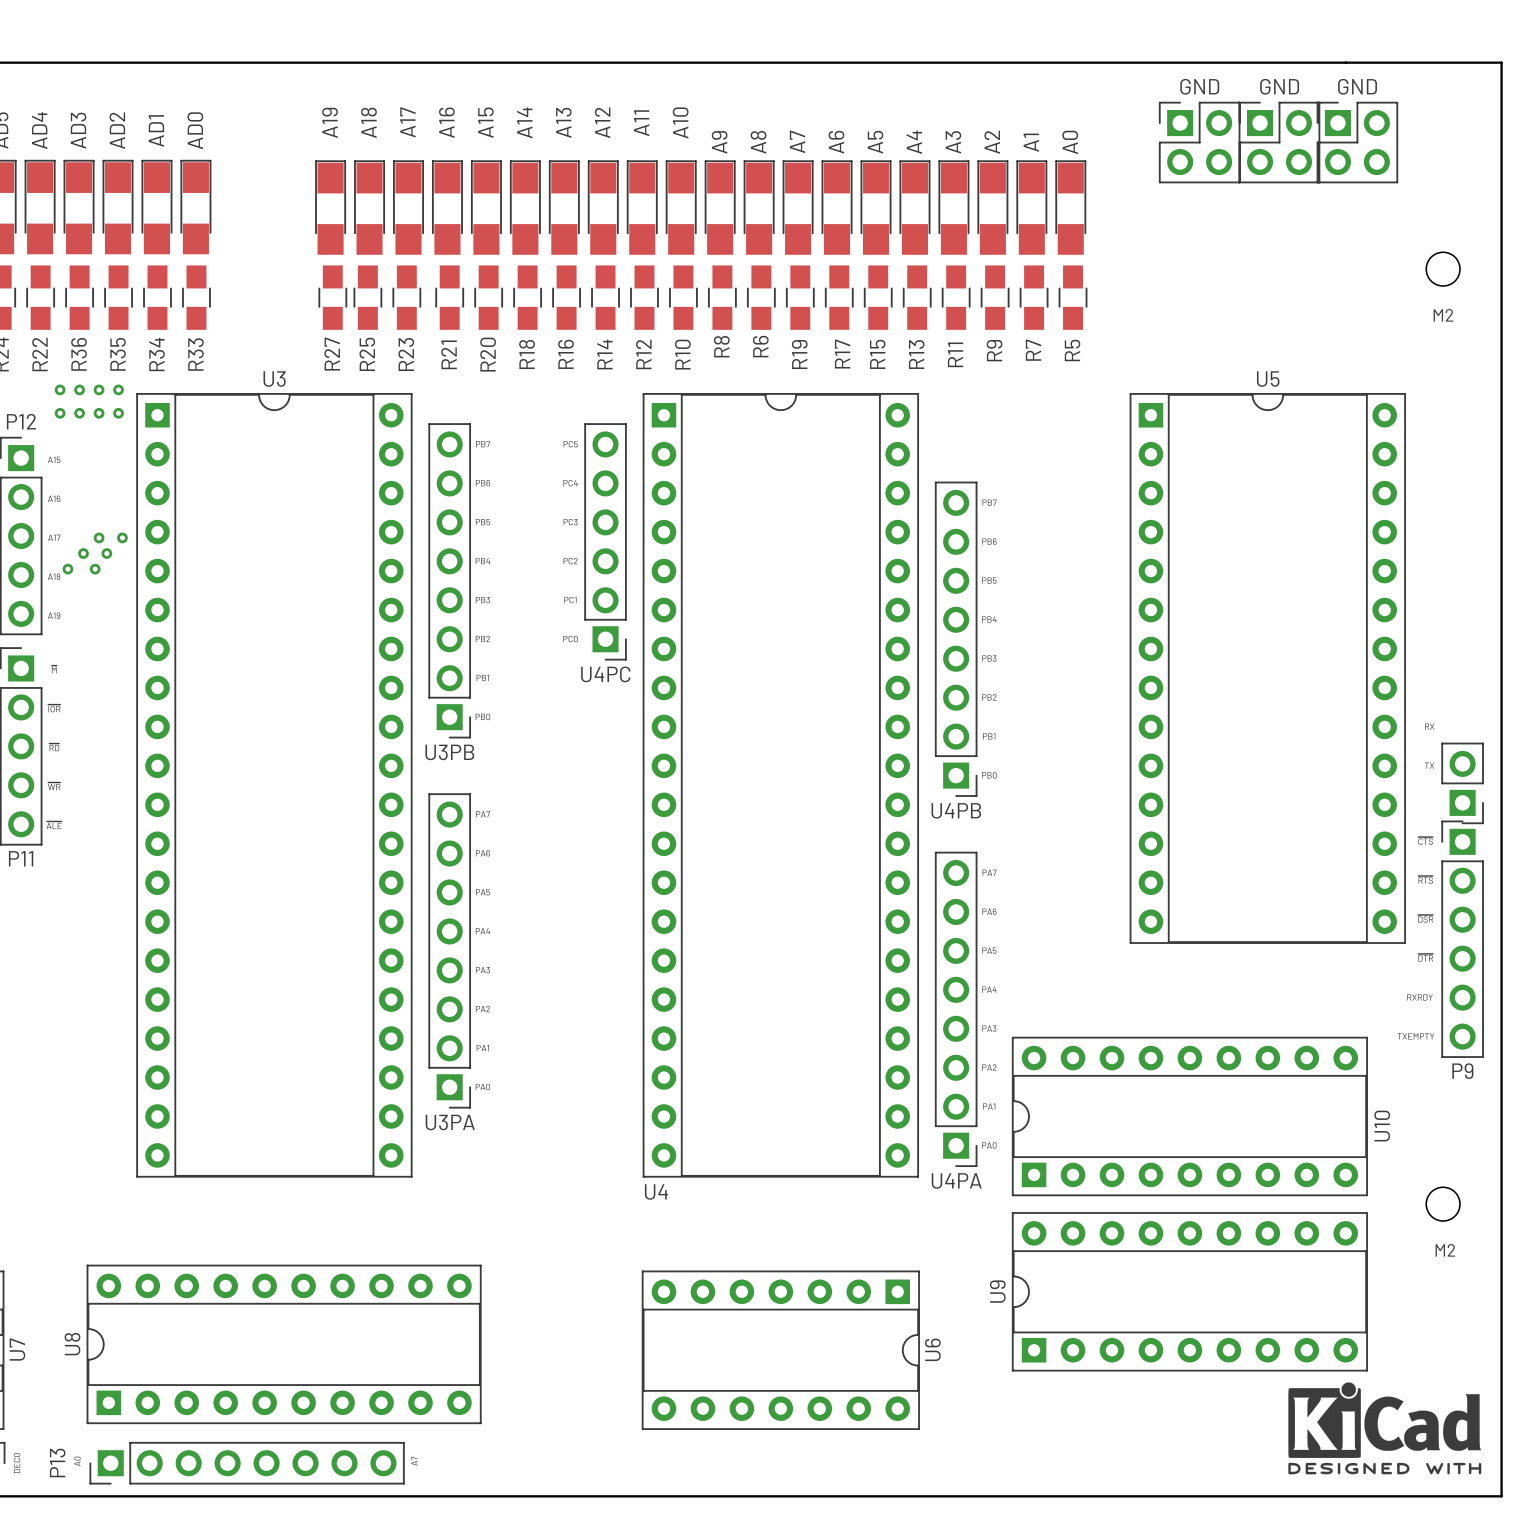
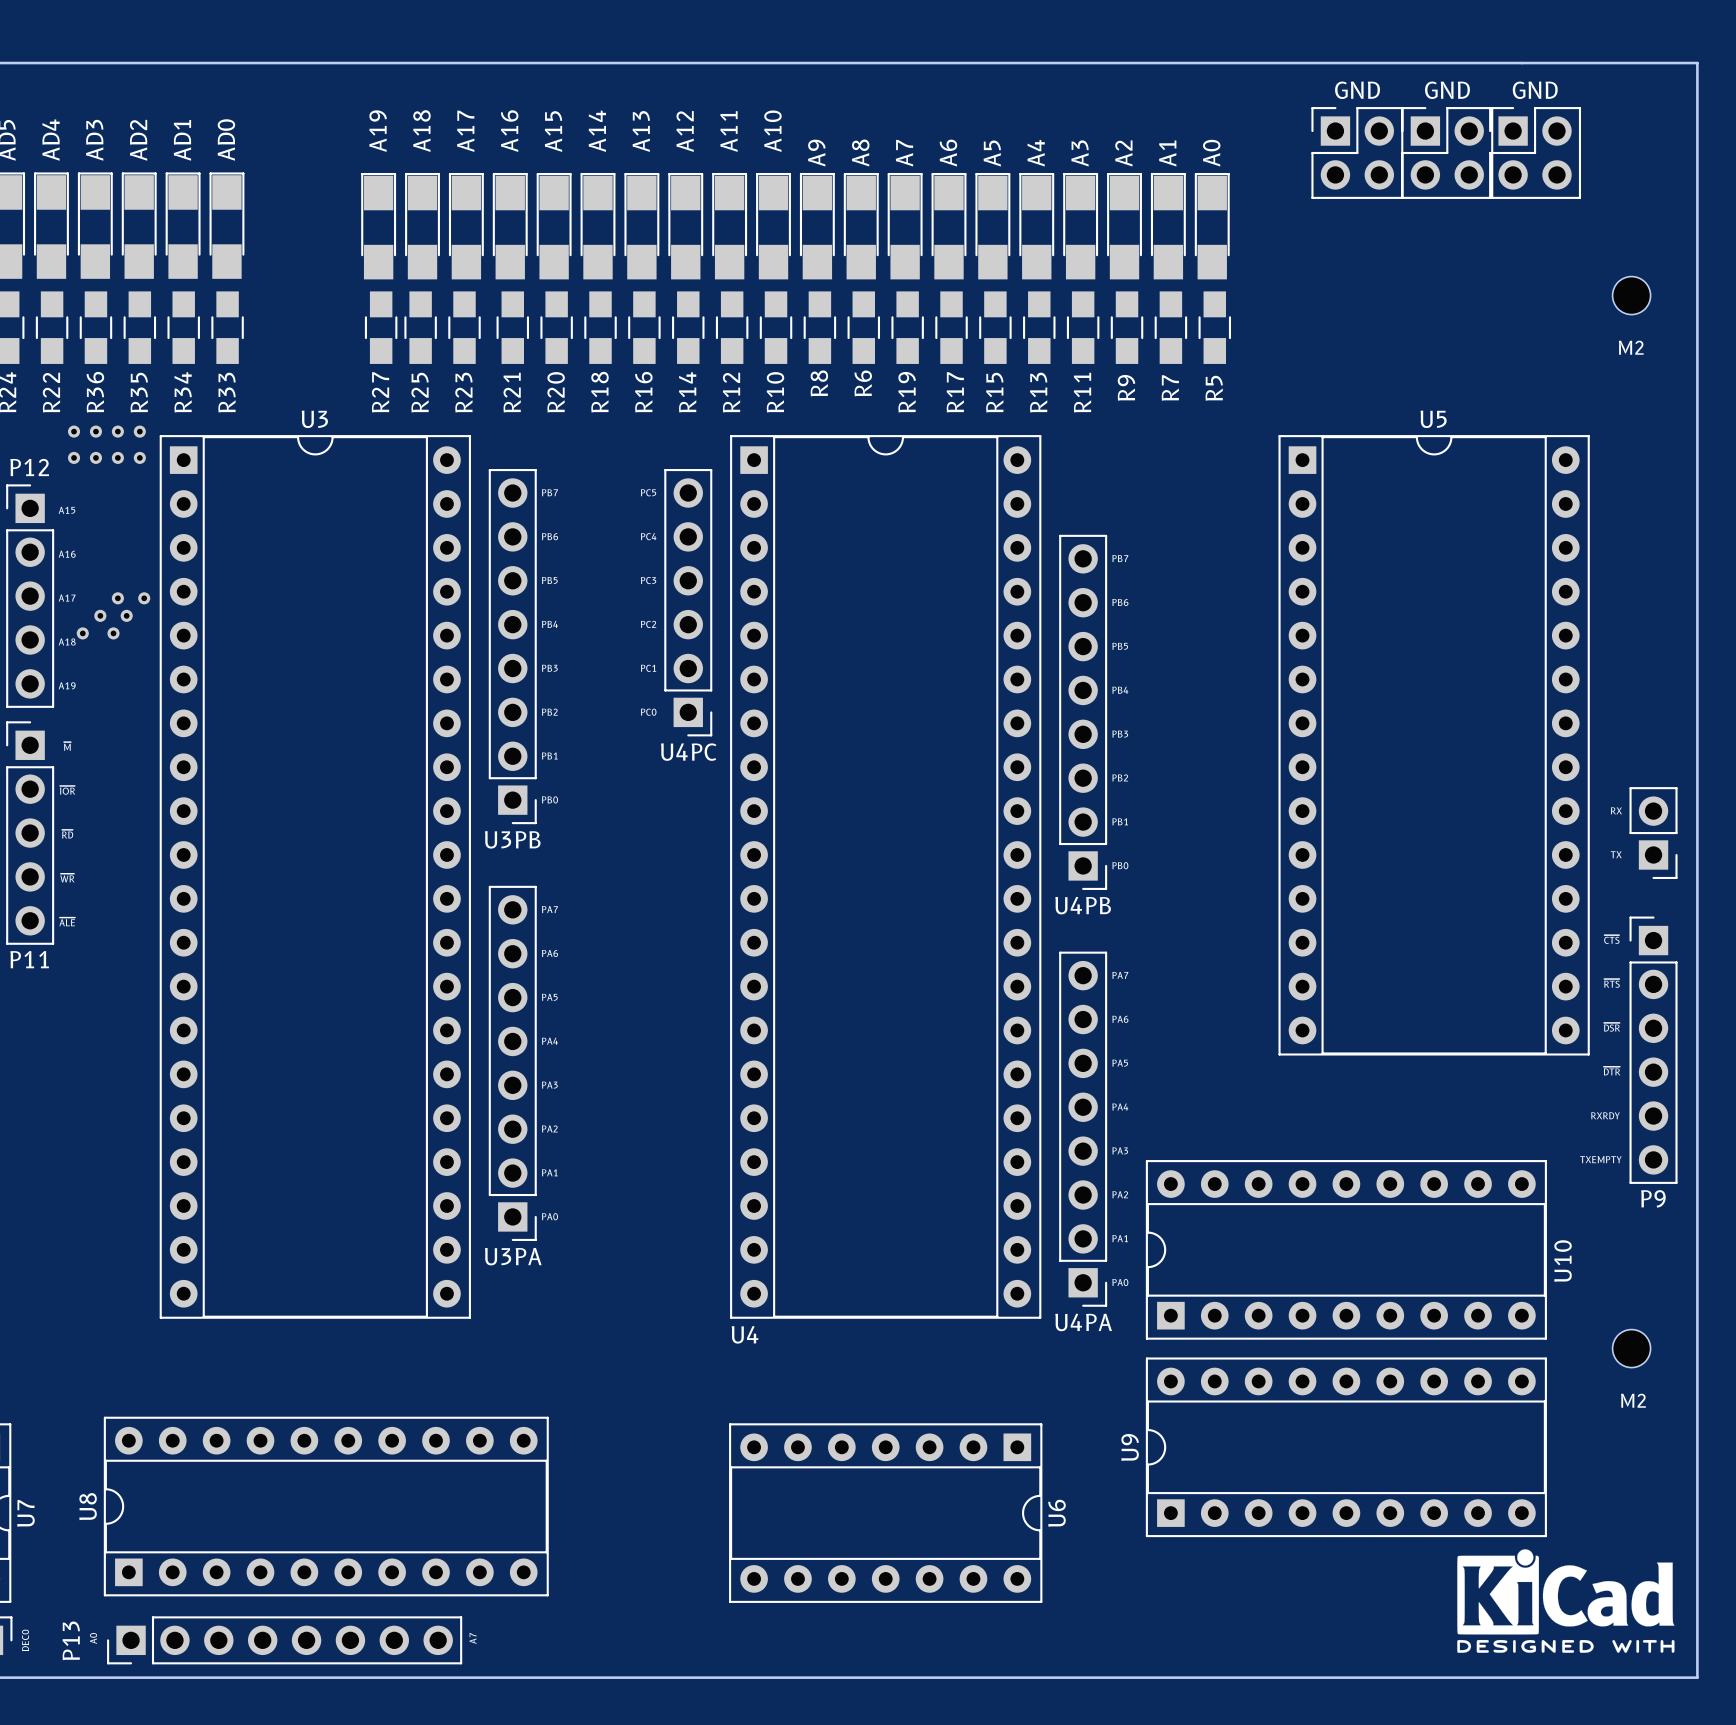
part position: (1462, 783) -> (1653, 833)

